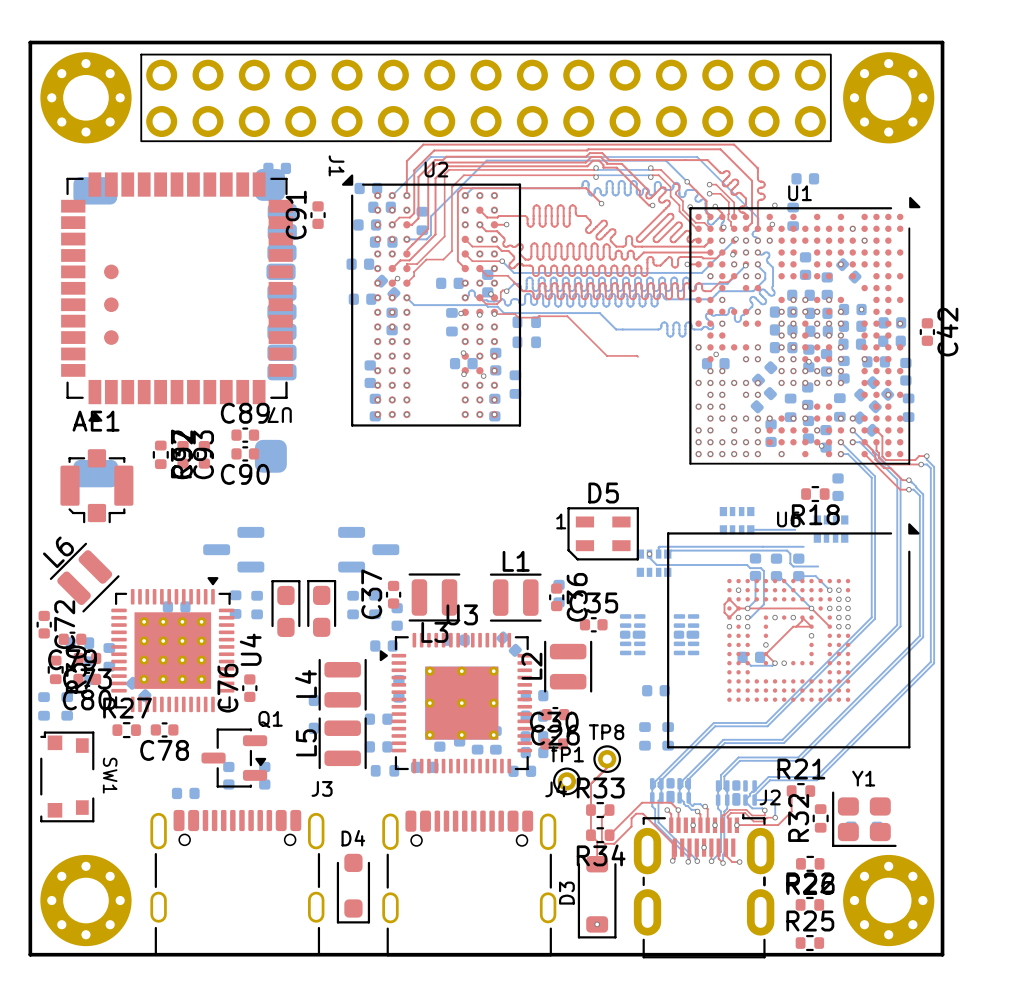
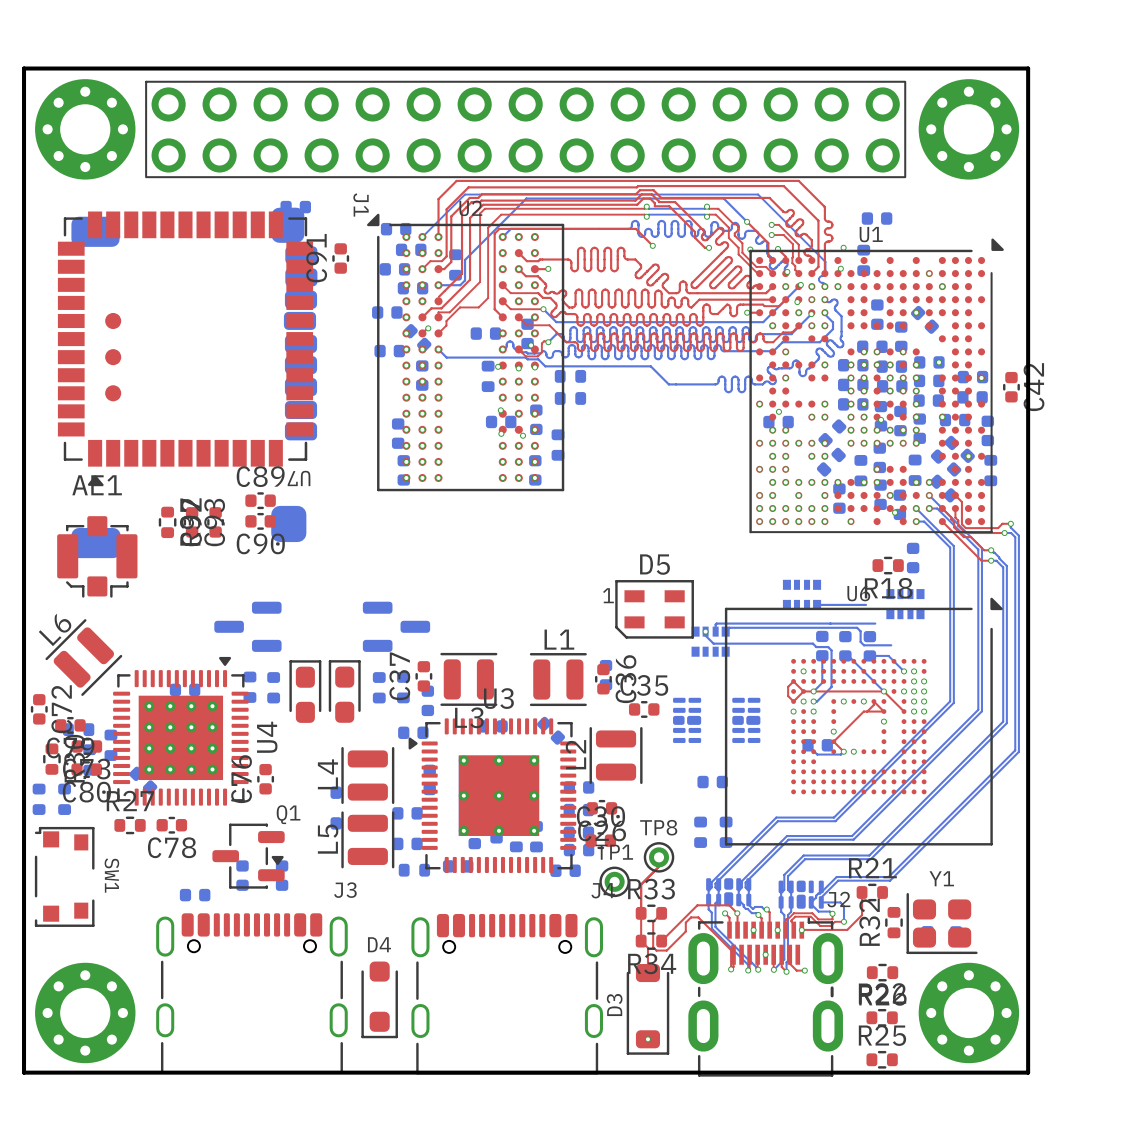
top track: (494, 314) (514, 314) (518, 317) (537, 317) (539, 315) -> none
top track: (539, 316) (567, 316) (607, 355) (638, 356) -> none

